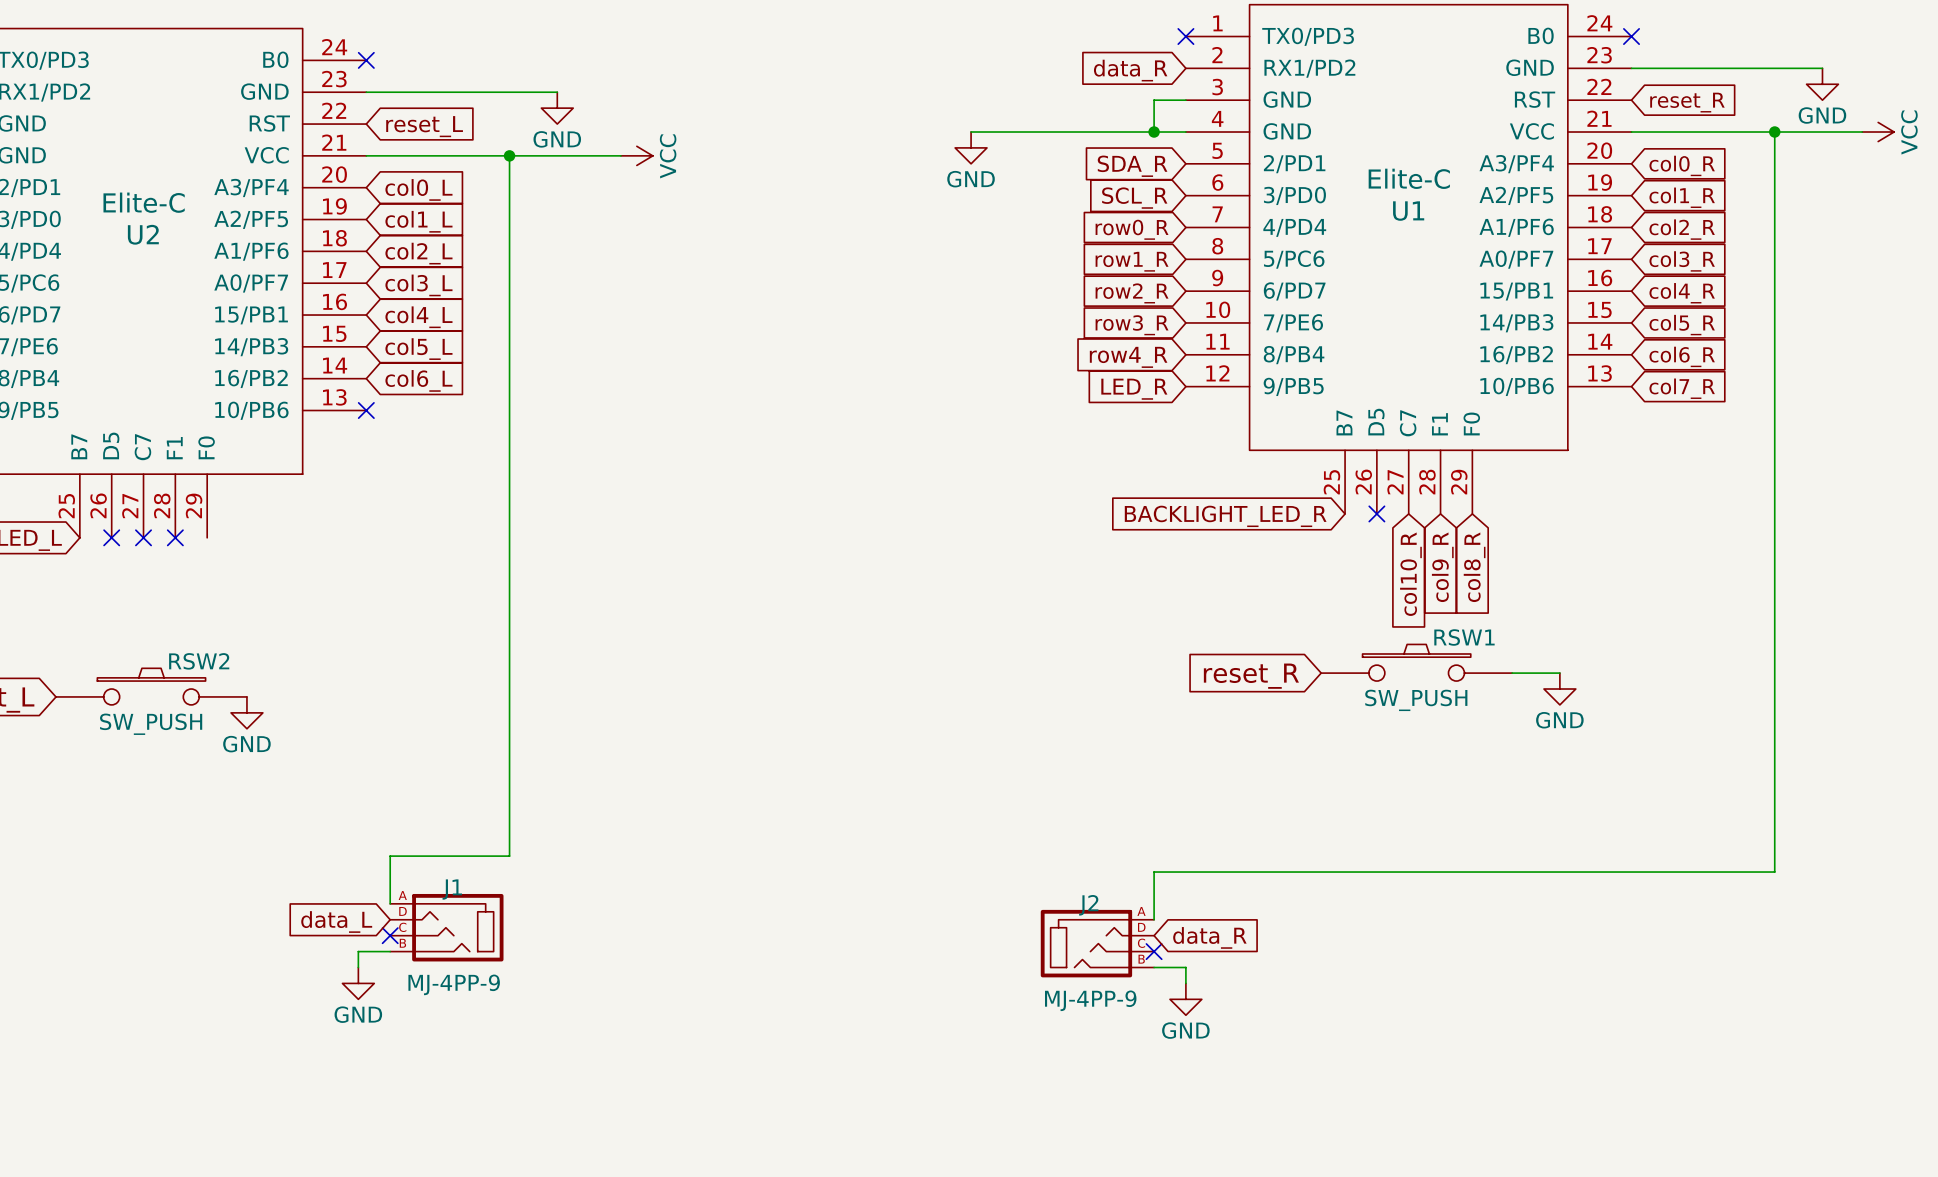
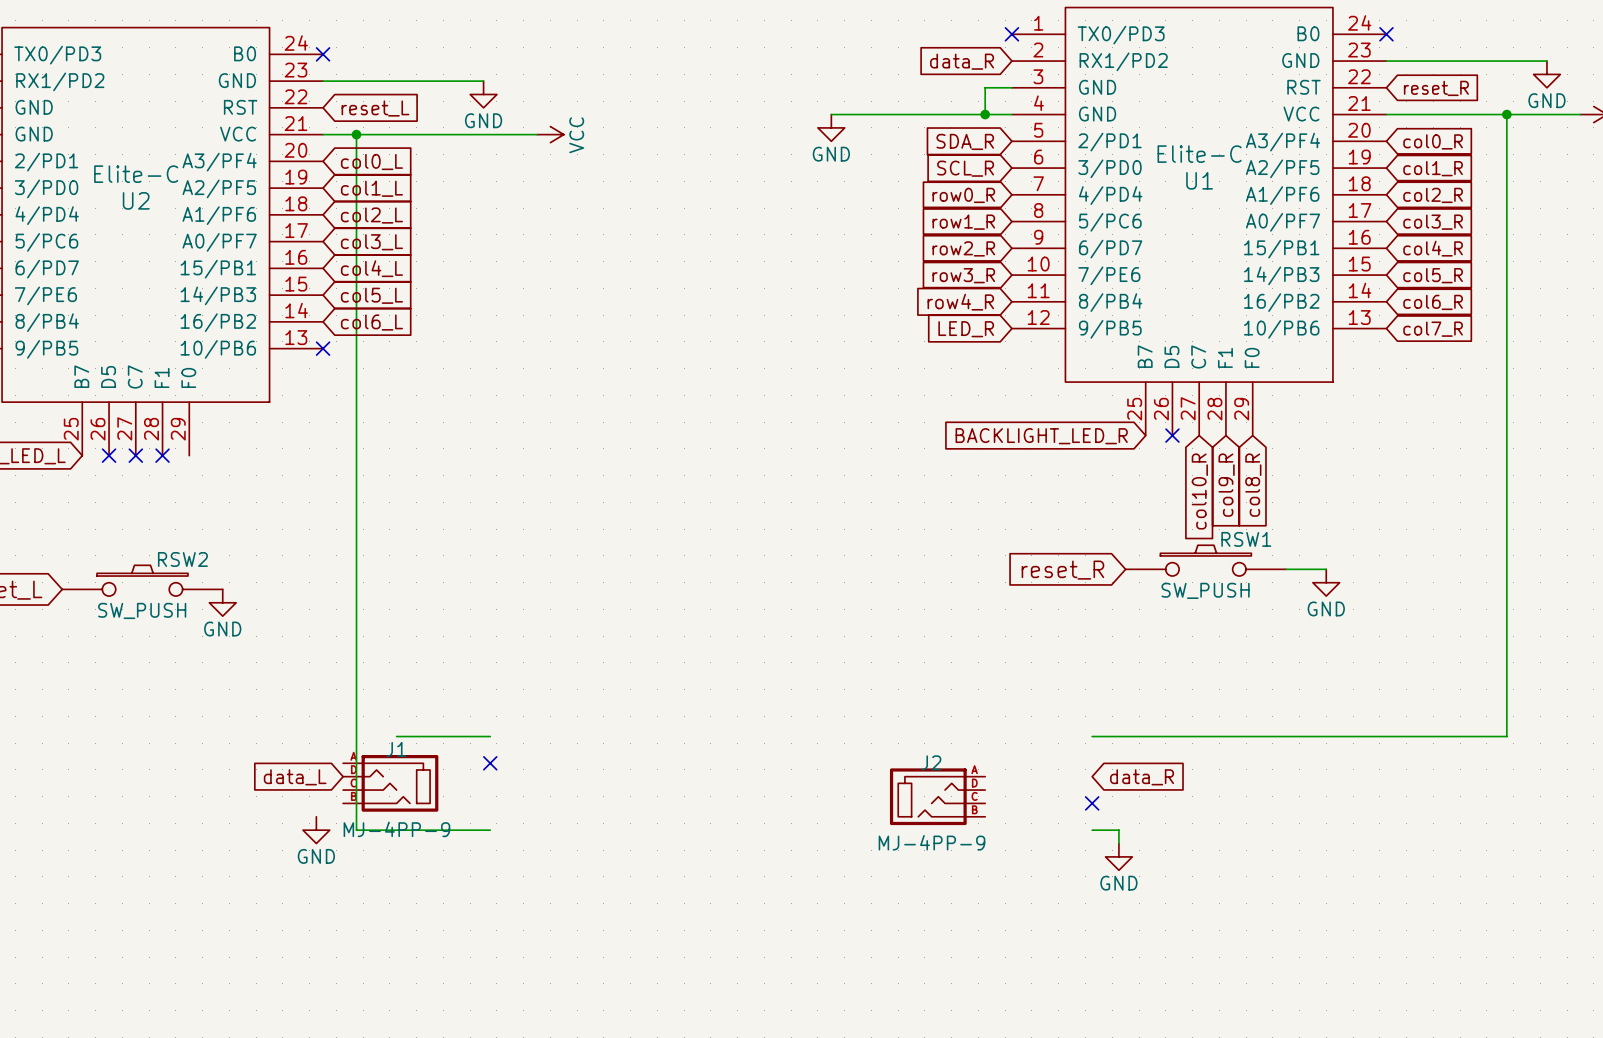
wire: none -> (356, 134) (356, 830) (490, 830)
junction: none -> (356, 134)
wire: (509, 155) (509, 856) (390, 856) (390, 903) -> none
junction: (509, 155) -> none
wire: none -> (396, 736) (490, 736)
wire: (1281, 872) (1154, 872) (1154, 919) -> none
no-connect mark: none -> (490, 763)
no-connect mark: (390, 935) -> none
global label position: data_R (1209, 937) -> data_R (1142, 777)
wire: (390, 951) (358, 951) (358, 967) -> none
no-connect mark: (1154, 951) -> none
no-connect mark: none -> (1092, 803)
wire: (1154, 967) (1185, 967) (1185, 983) -> (1092, 830) (1118, 830) (1118, 843)
power symbol position: GND (1185, 999) -> GND (1118, 856)

